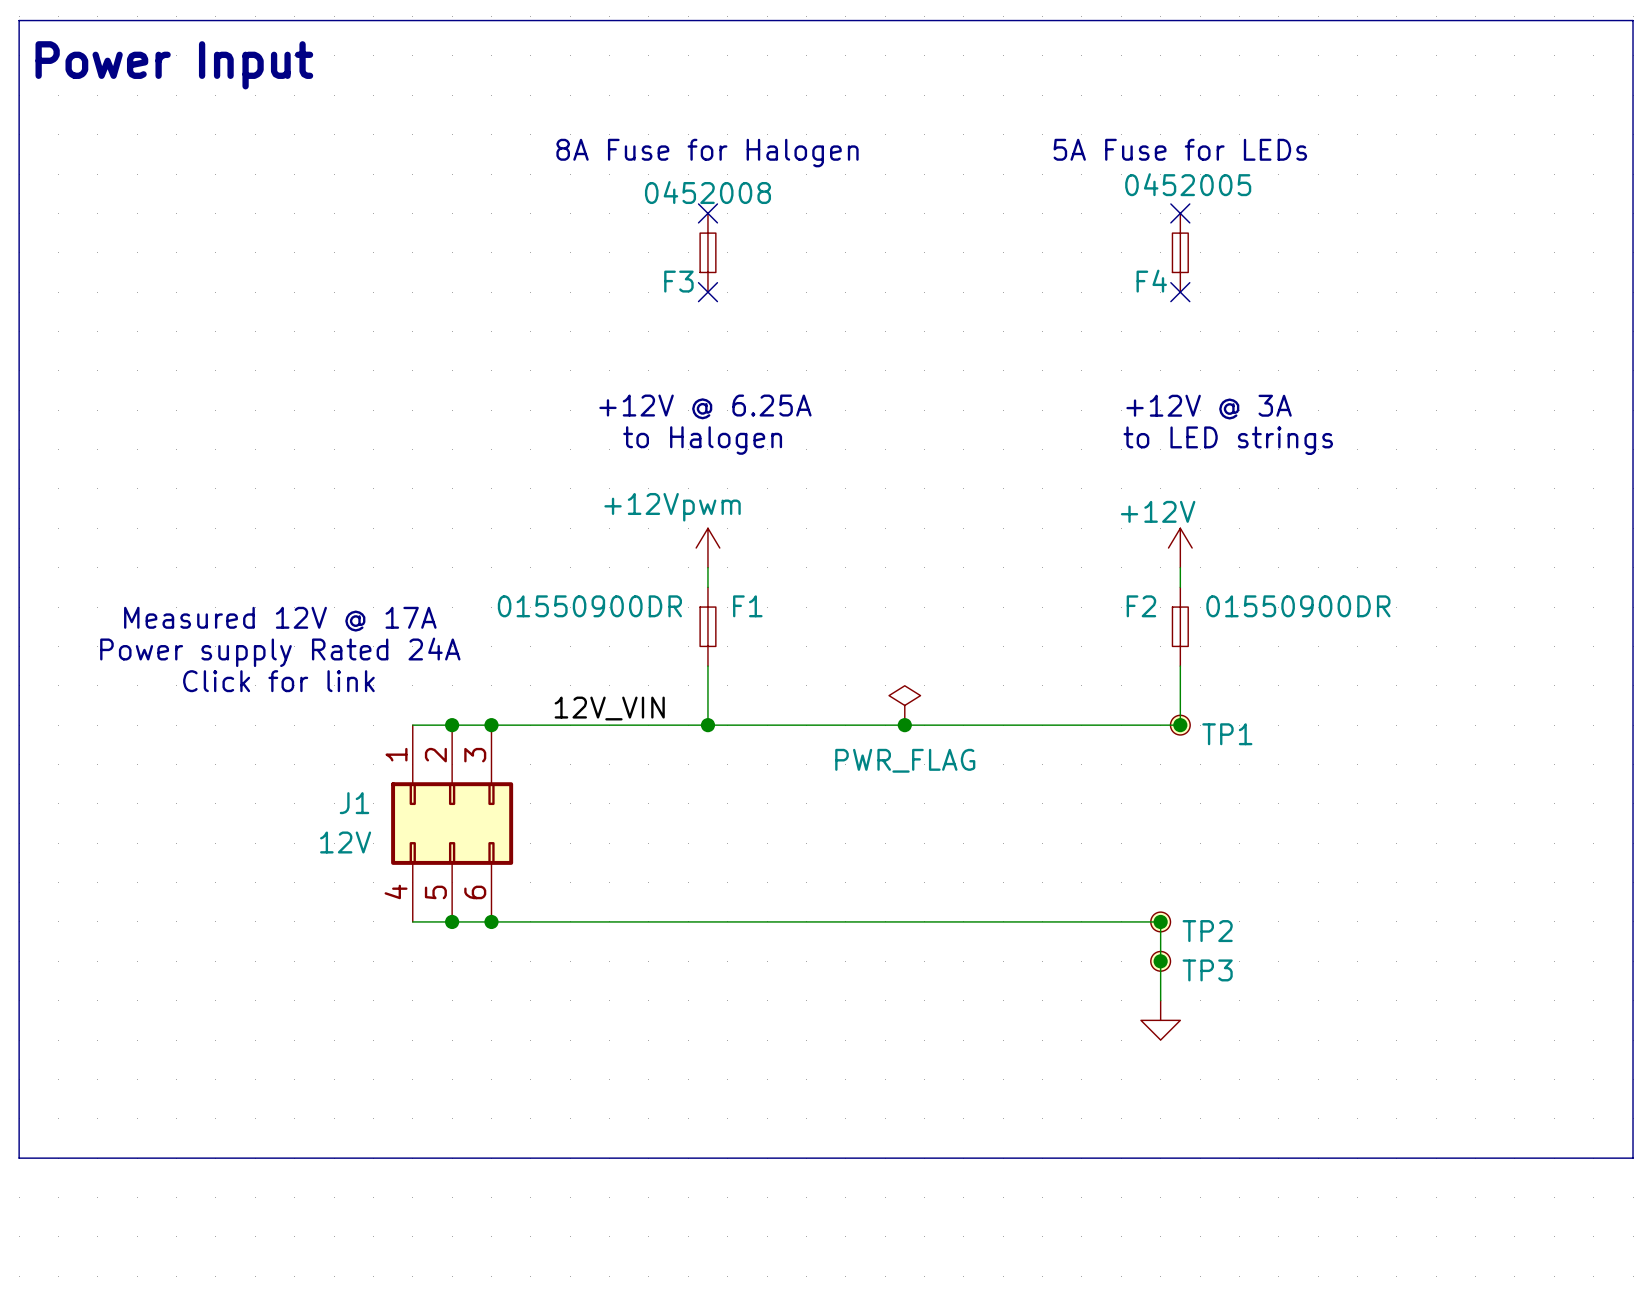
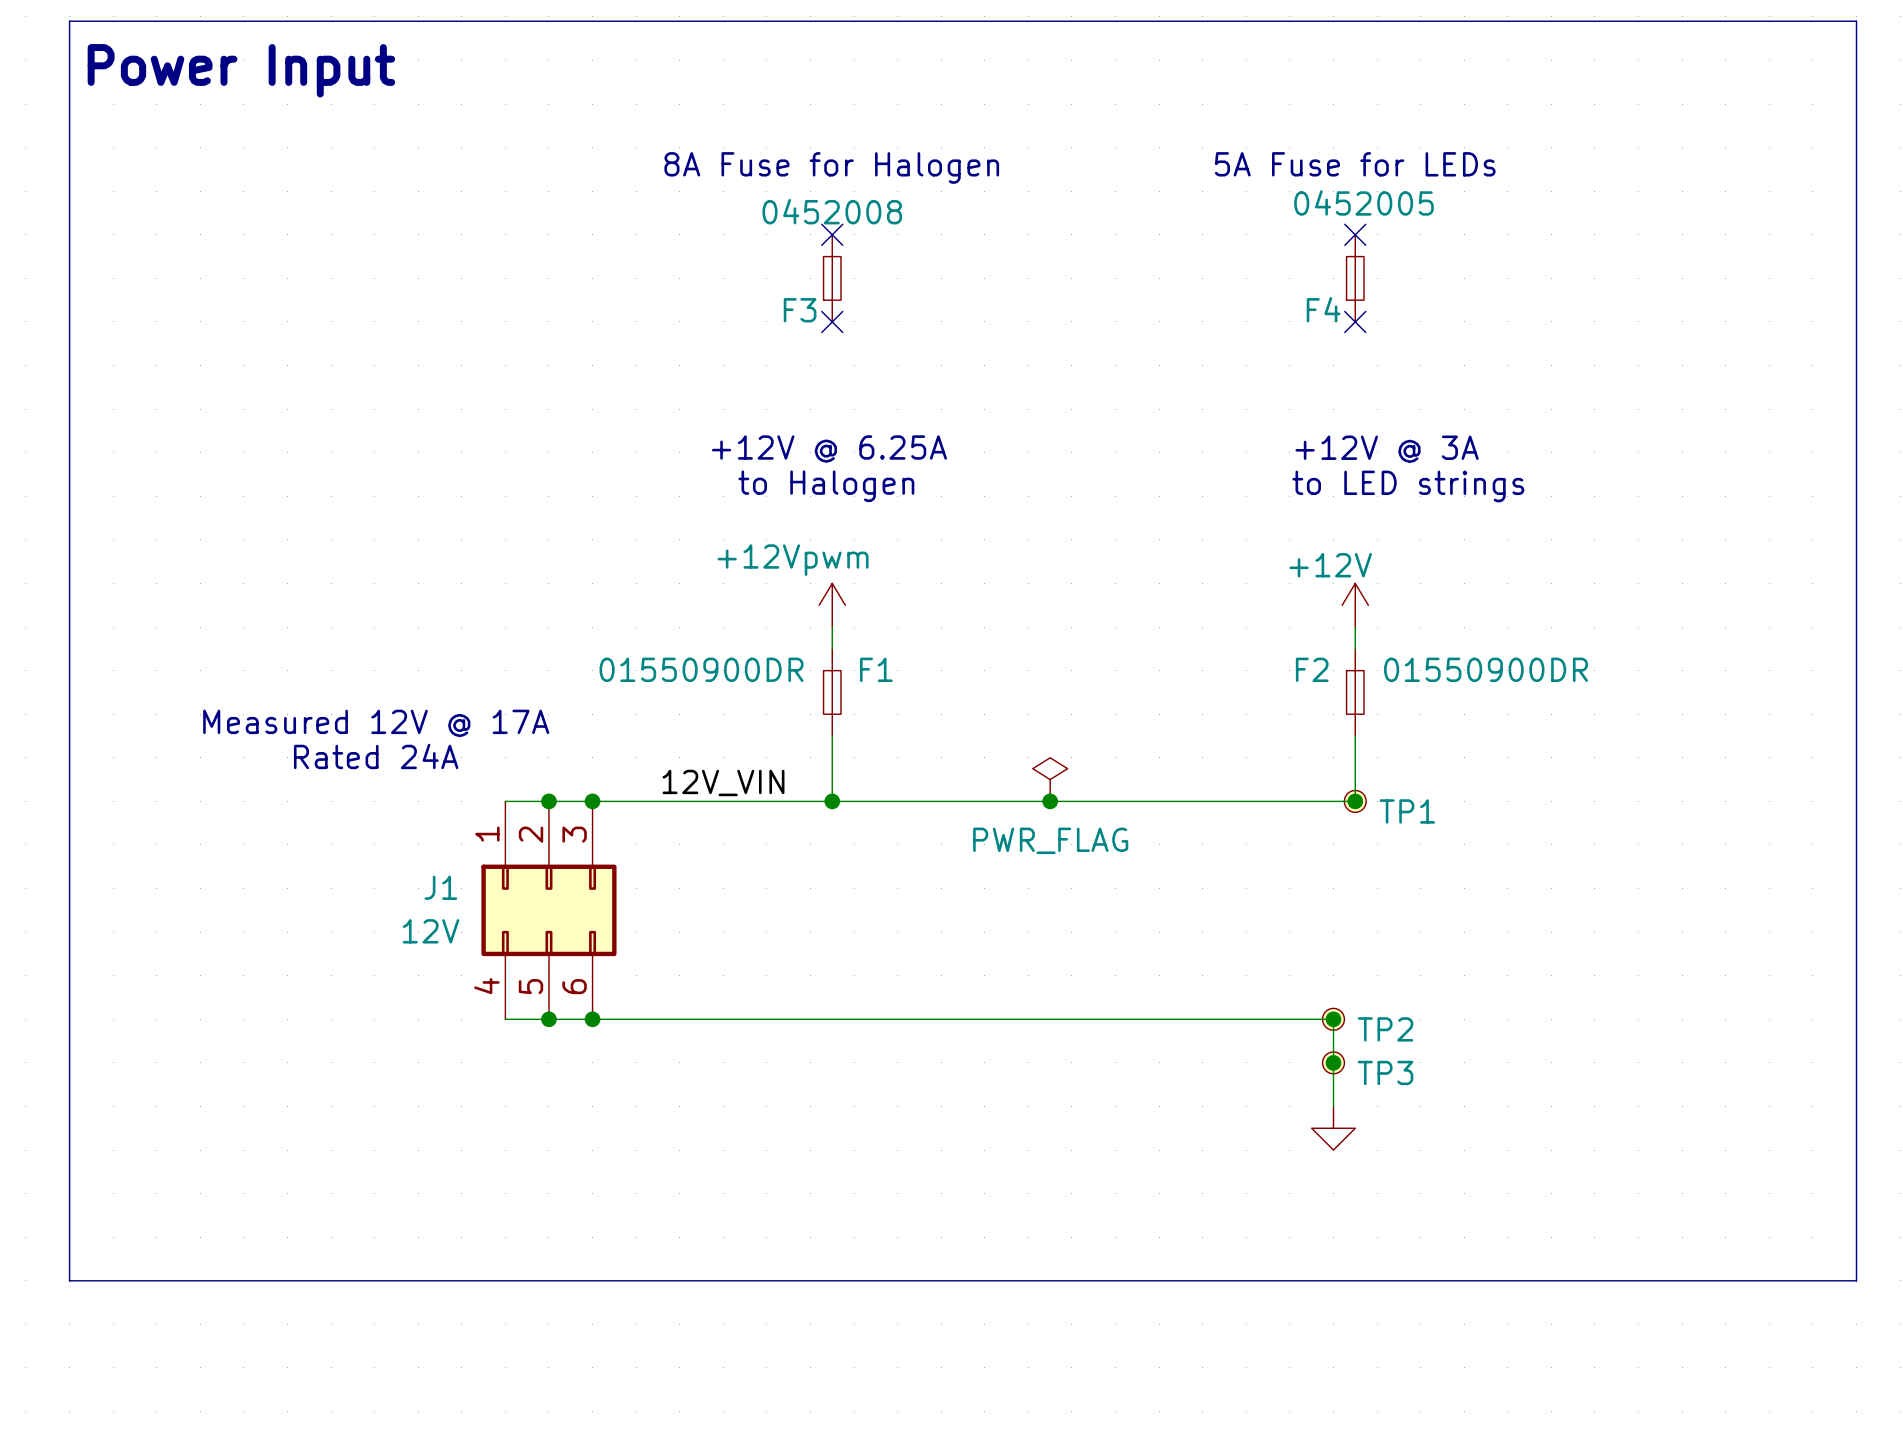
text position: Measured 12V @ 17A (280, 619) -> Measured 12V @ 17A (376, 723)
text: Power supply Rated 24A (280, 652) -> none
text: Click for link (278, 681) -> none
text: none -> Rated 24A (376, 756)

